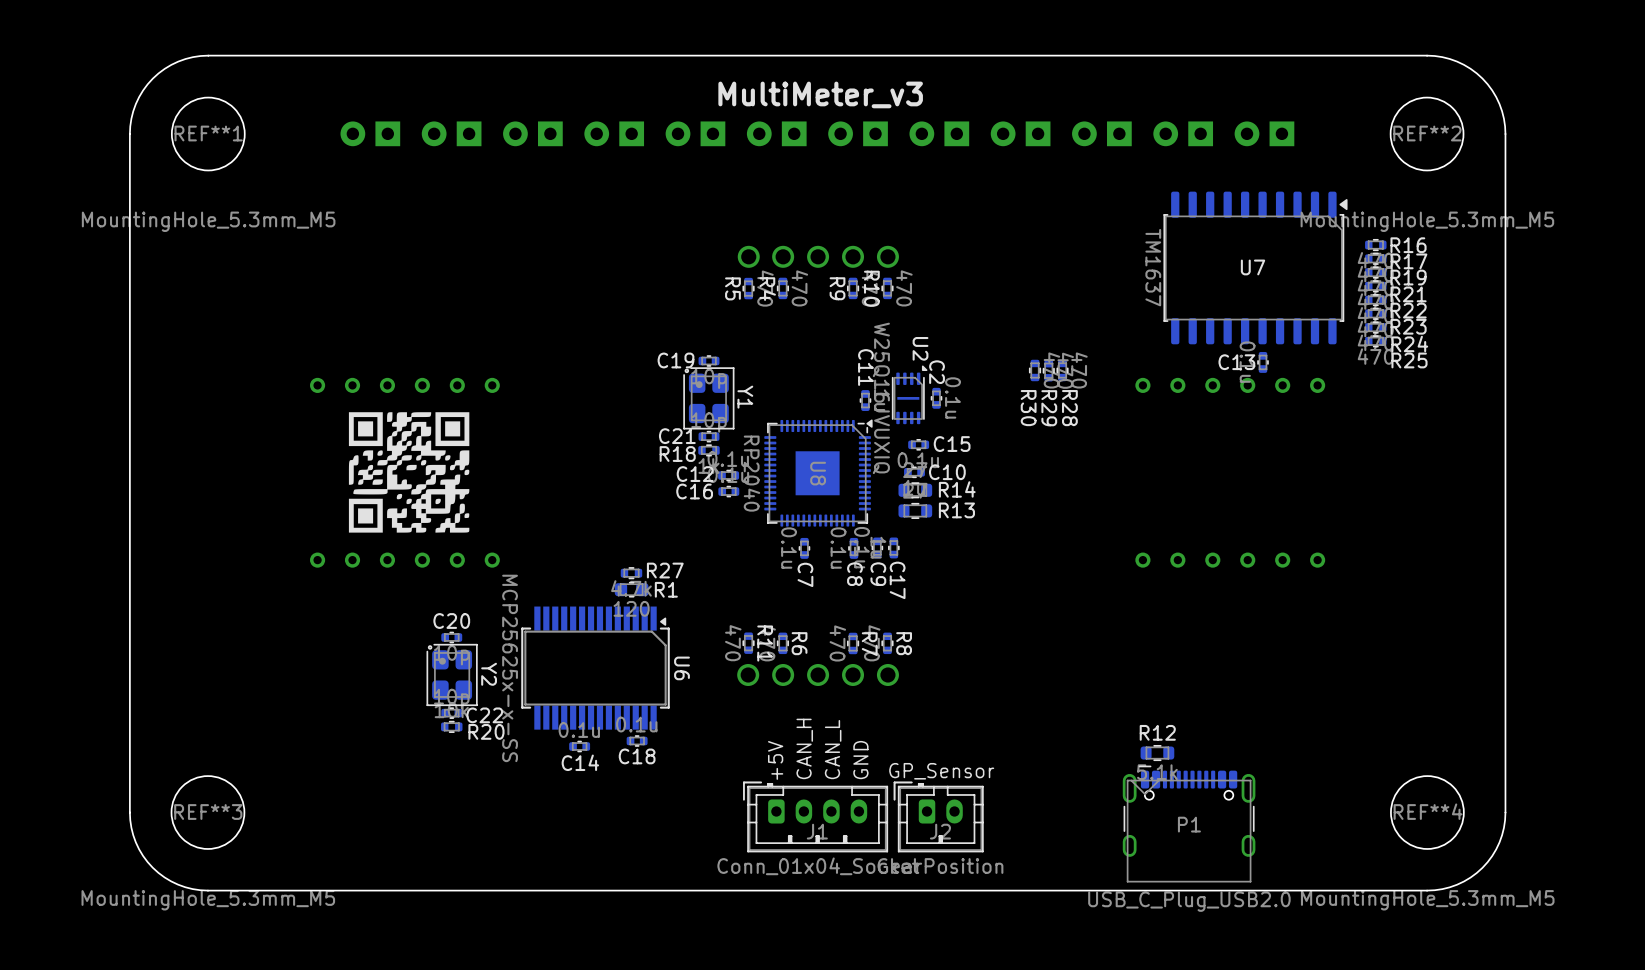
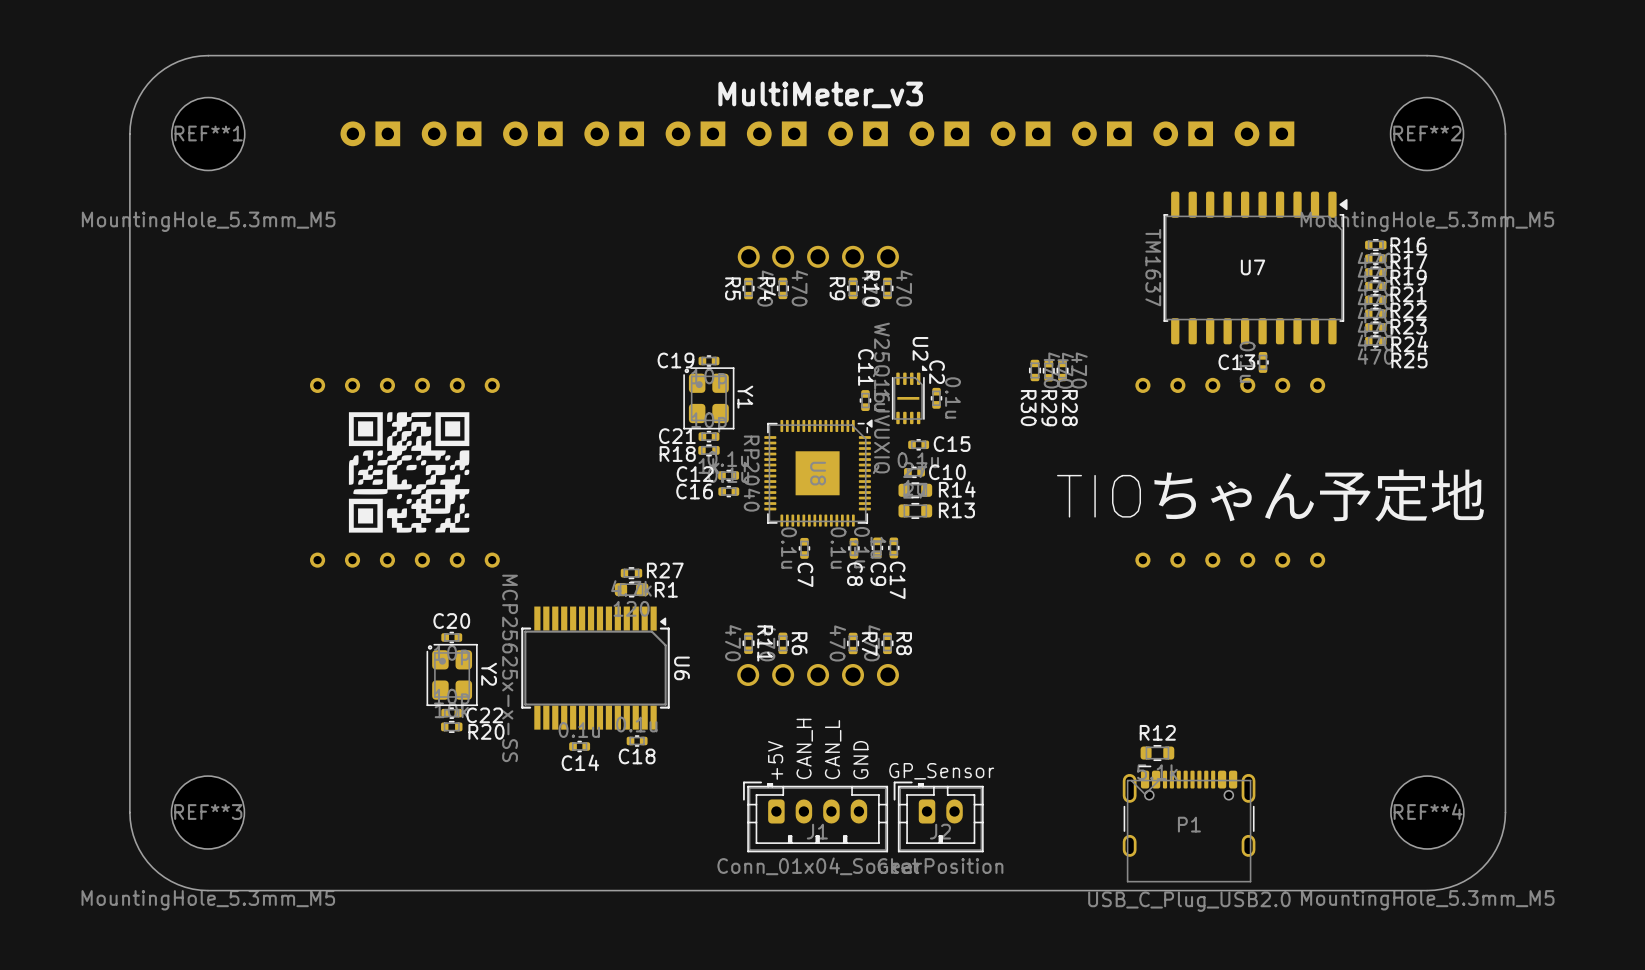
text: none -> TIOちゃん予定地 (1270, 495)

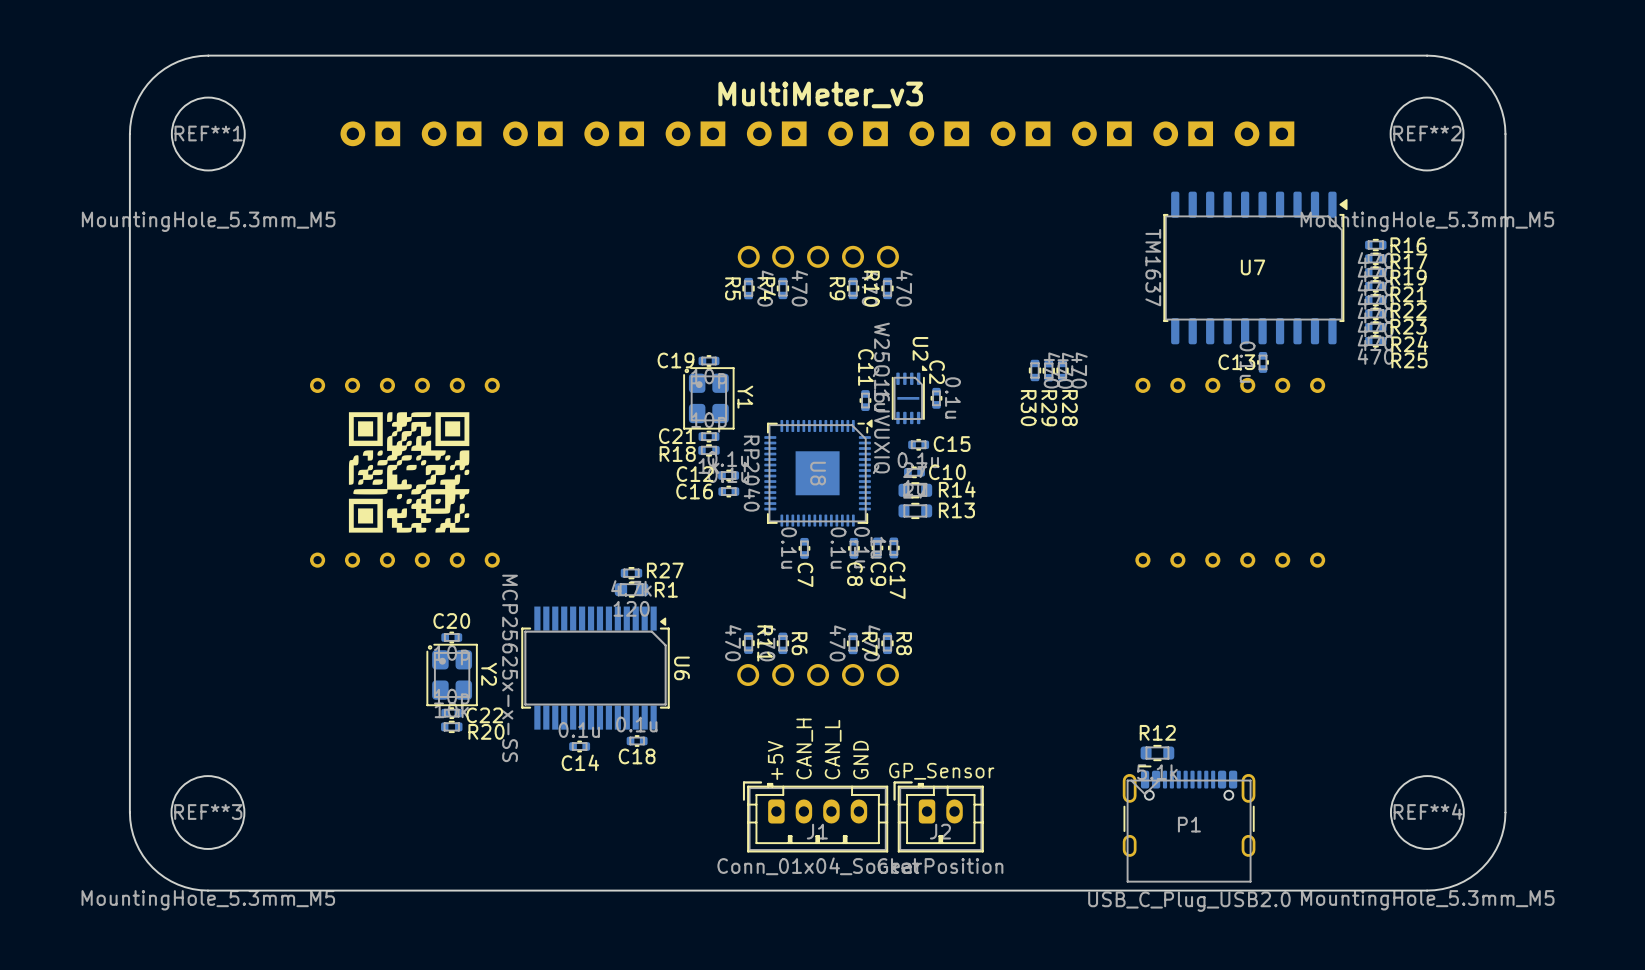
text: TIOちゃん予定地 (1270, 495) -> none

